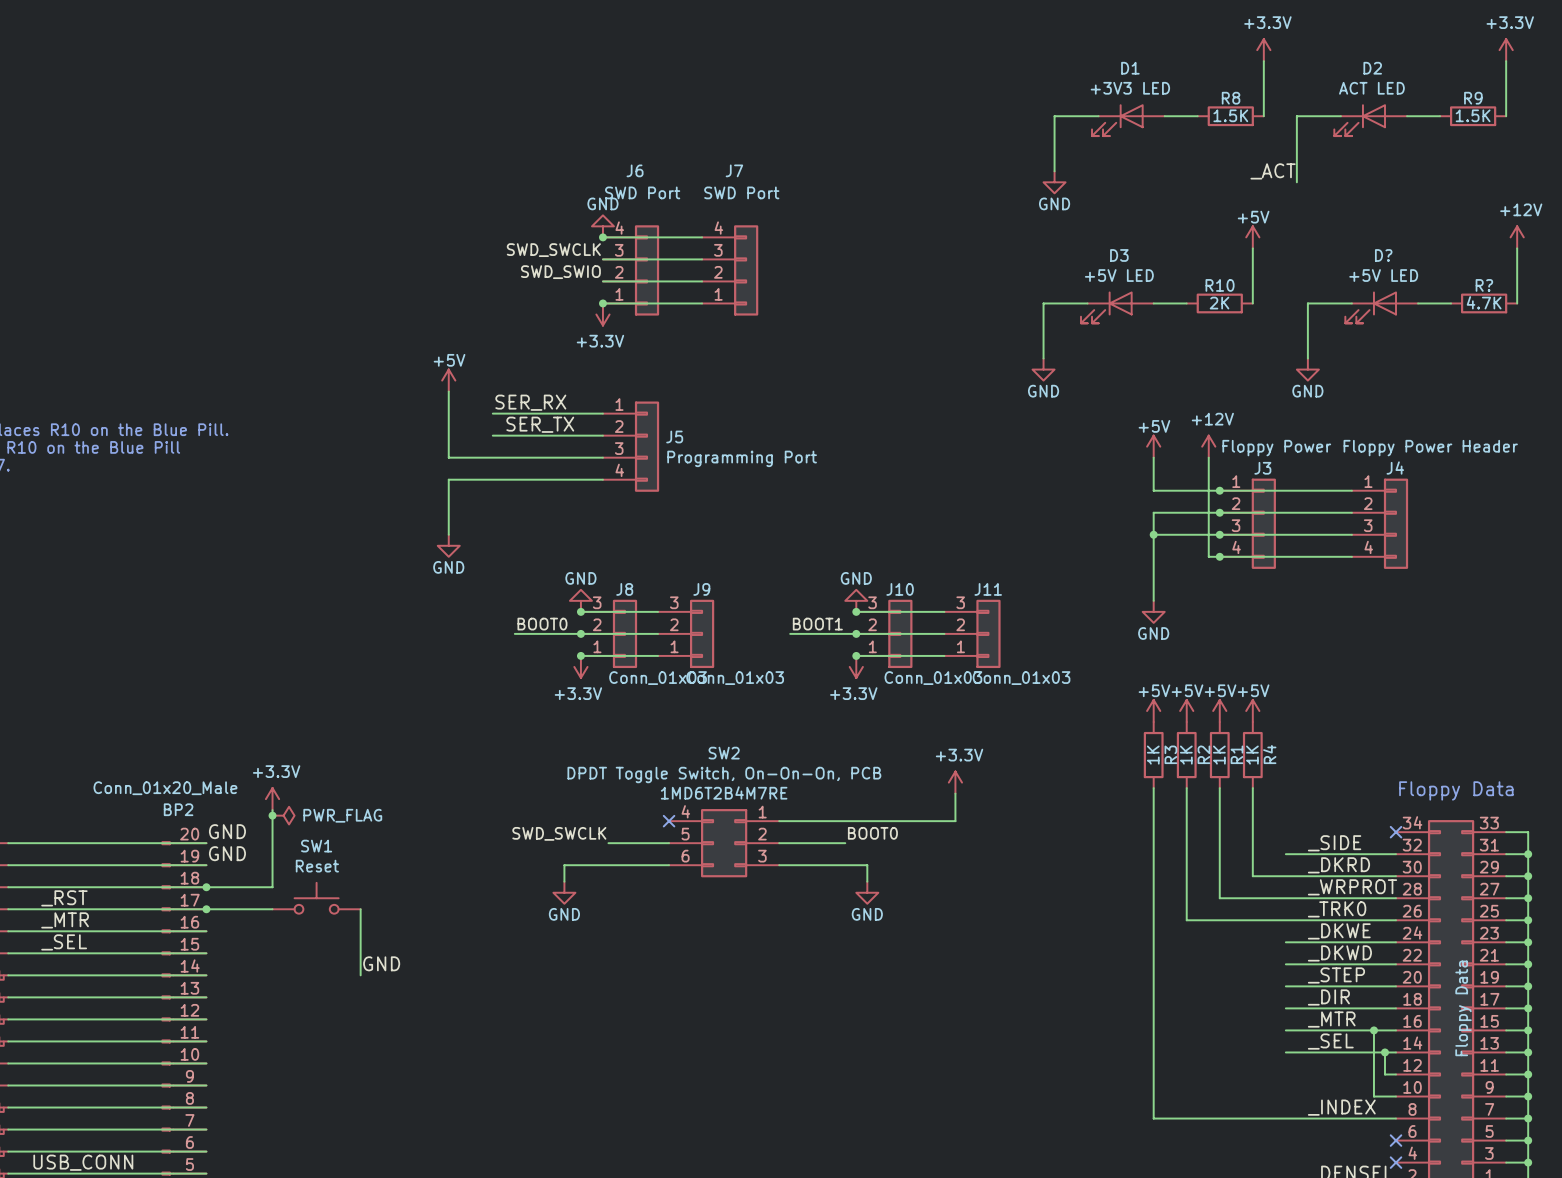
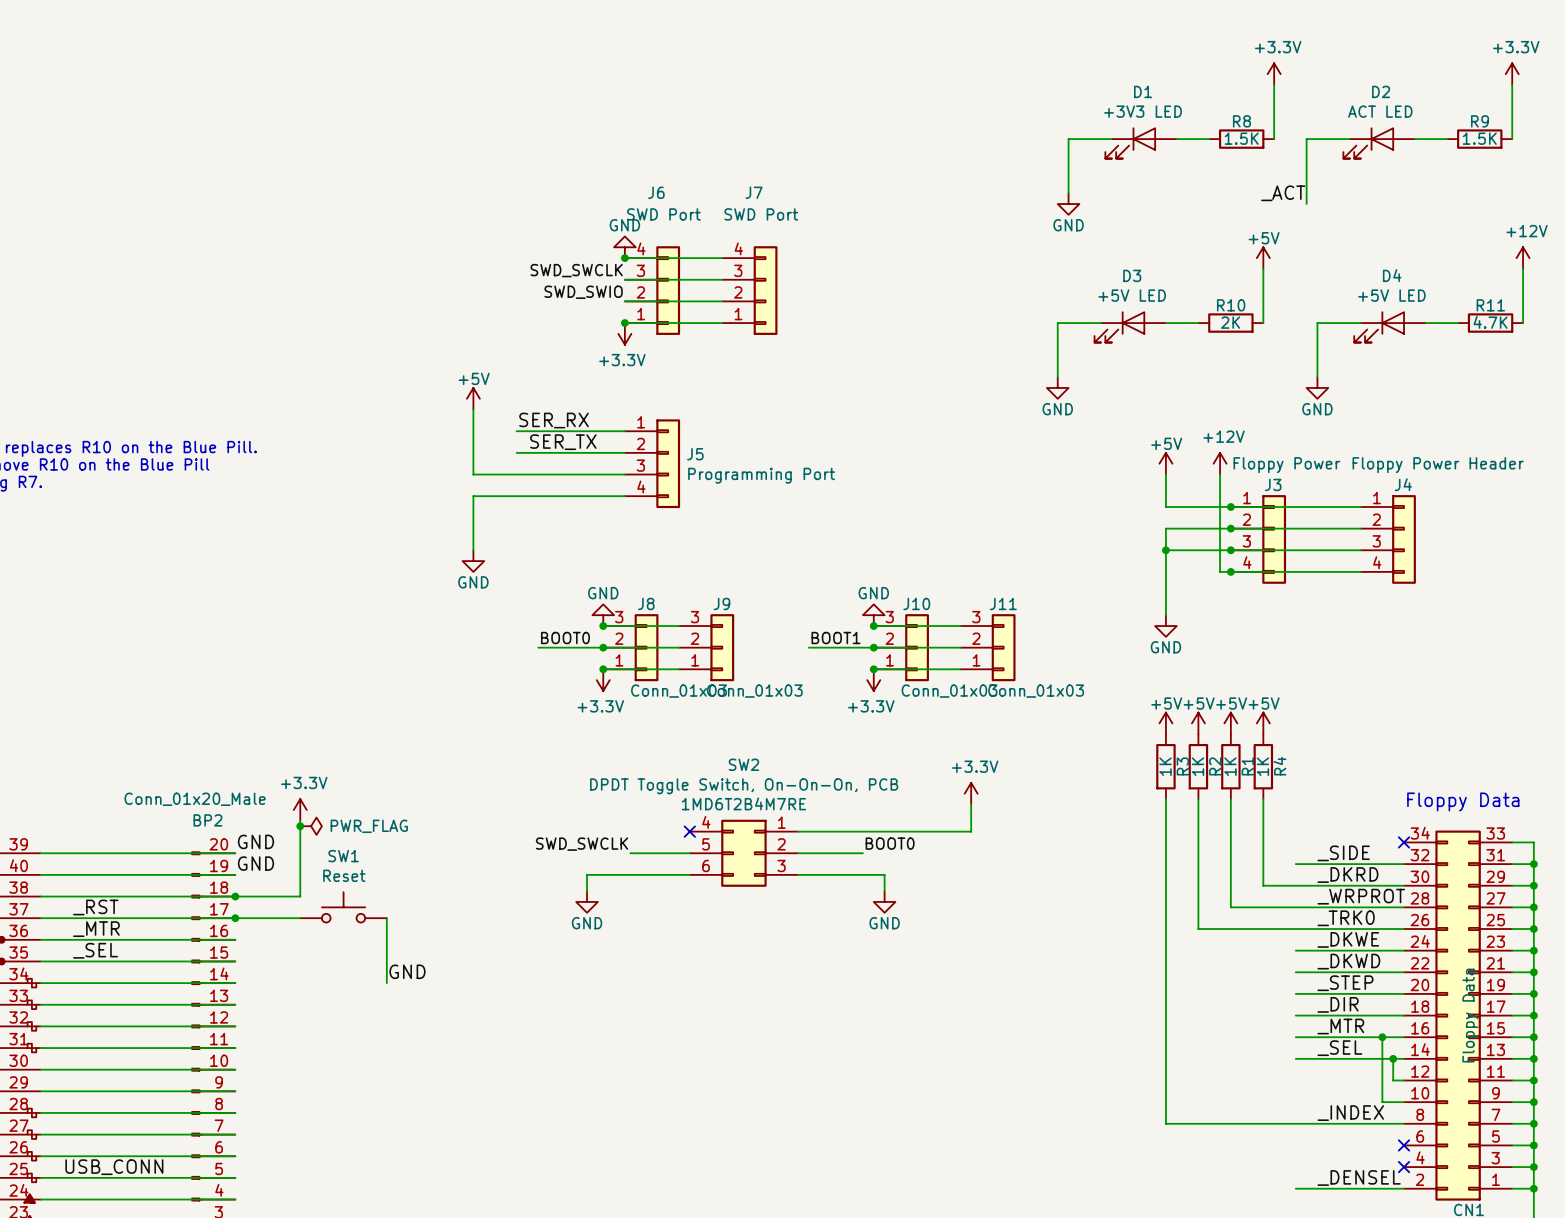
D? name: D? (1383, 255) -> D4 (1392, 275)
R? name: R? (1484, 285) -> R11 (1490, 305)

